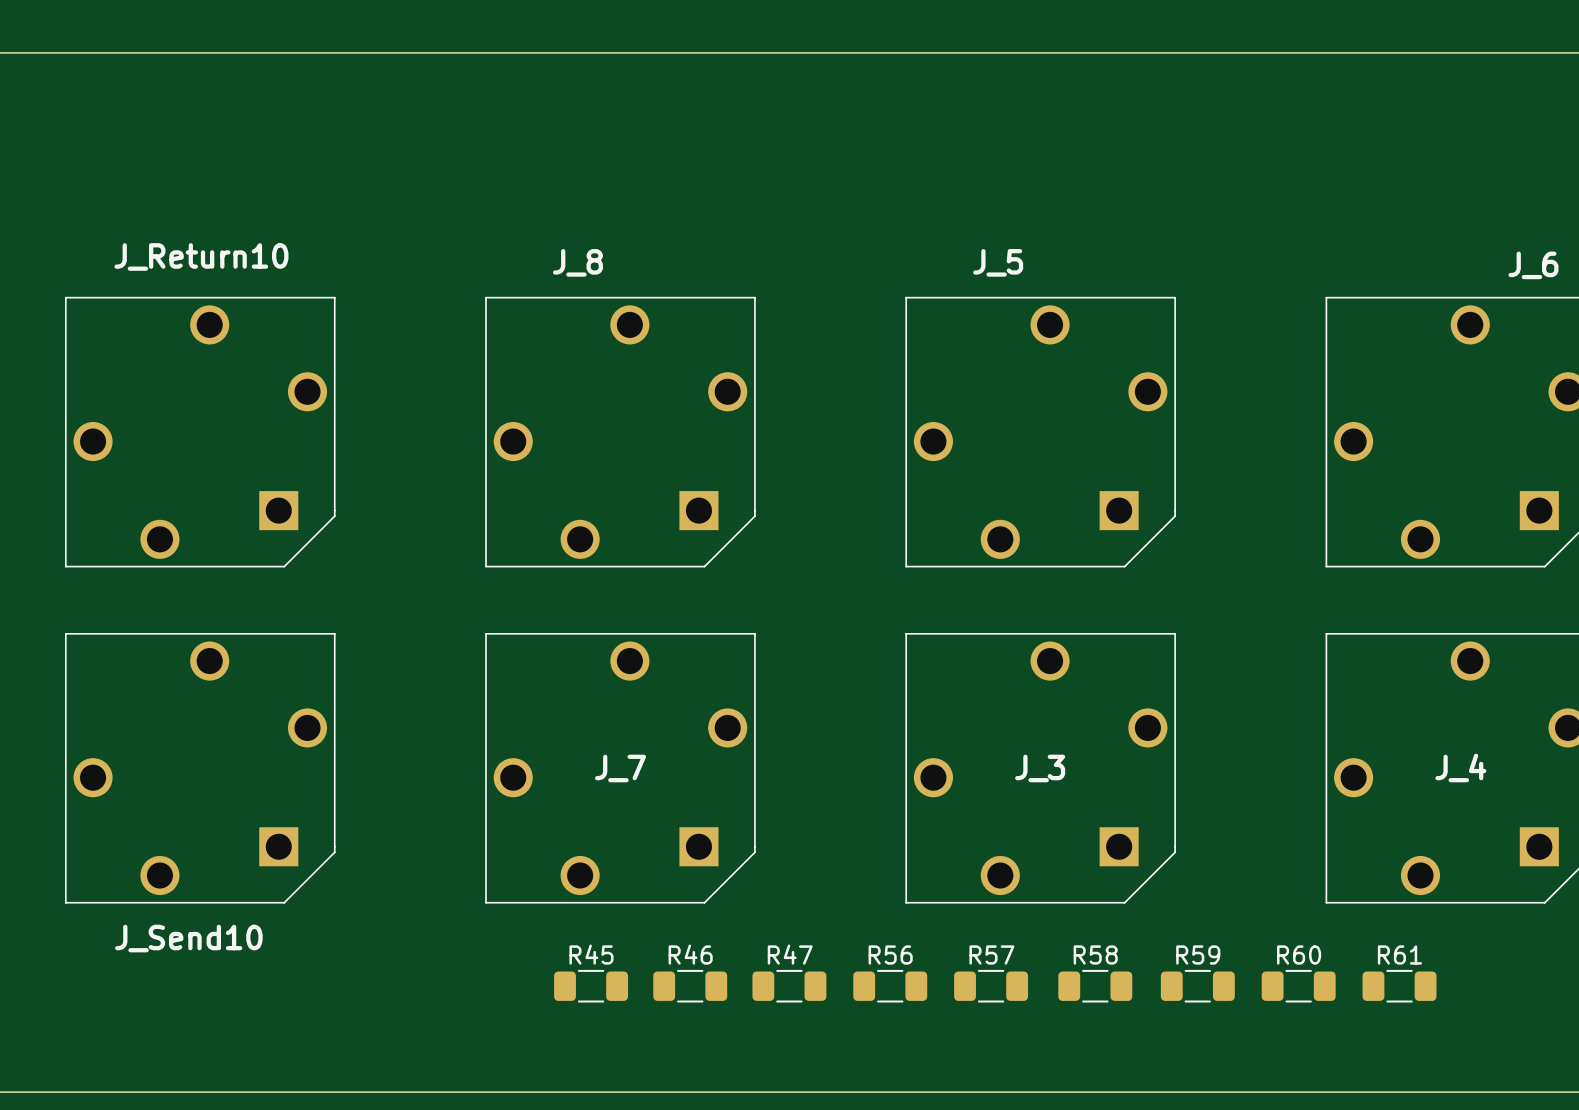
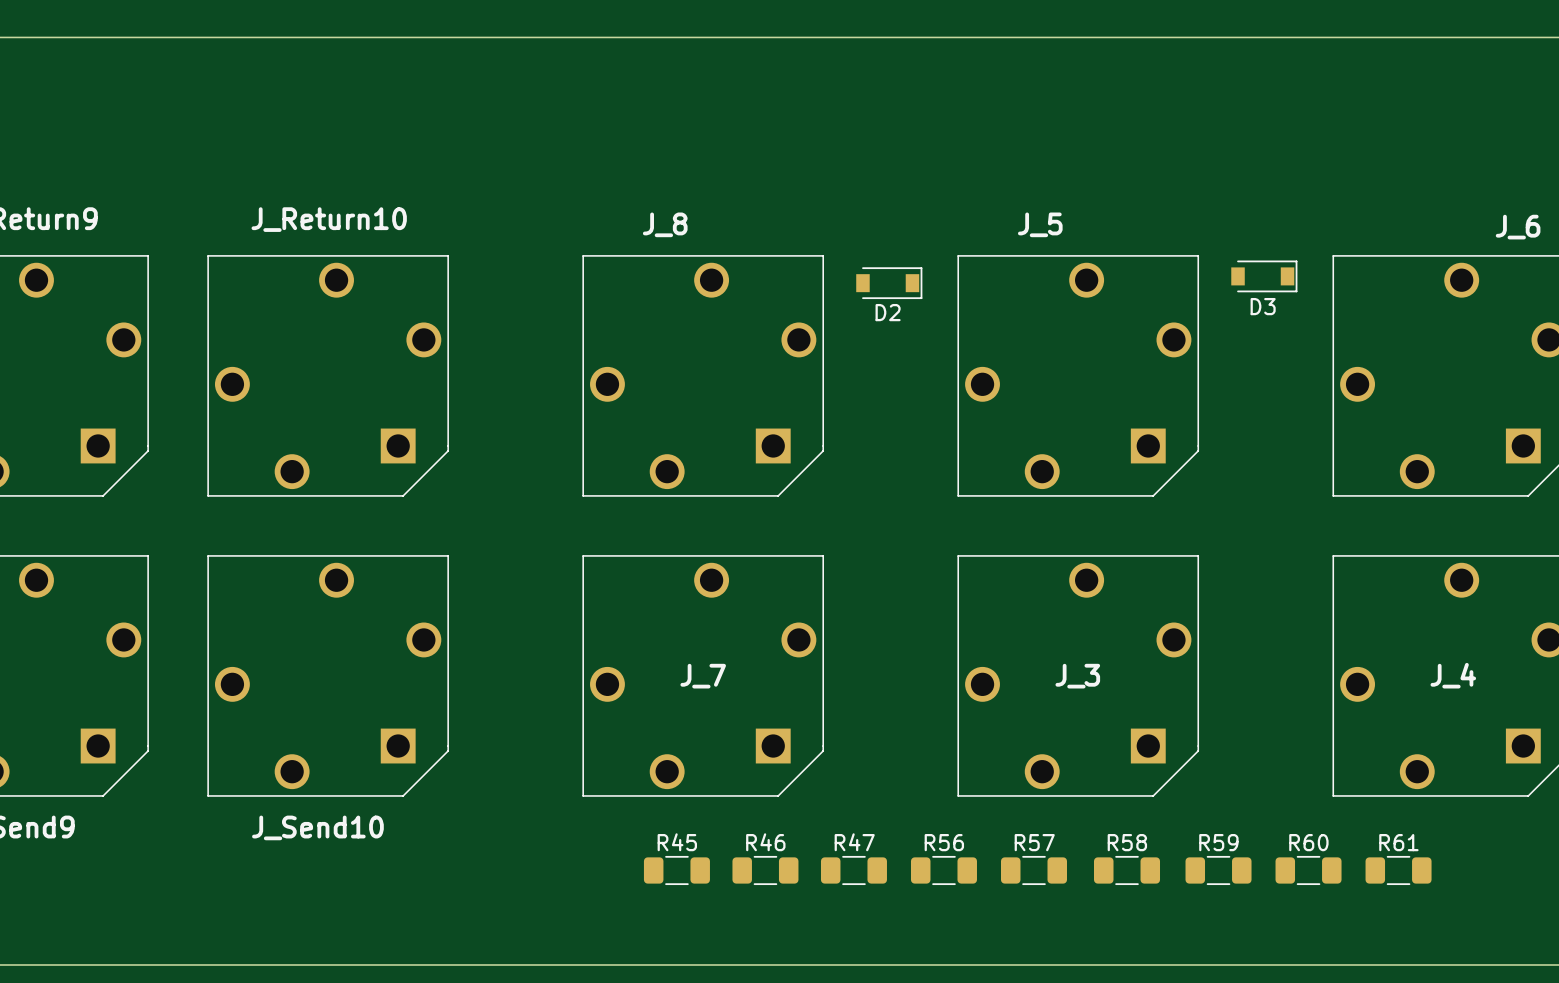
D3: none -> (1264, 276)
D2: none -> (889, 283)

